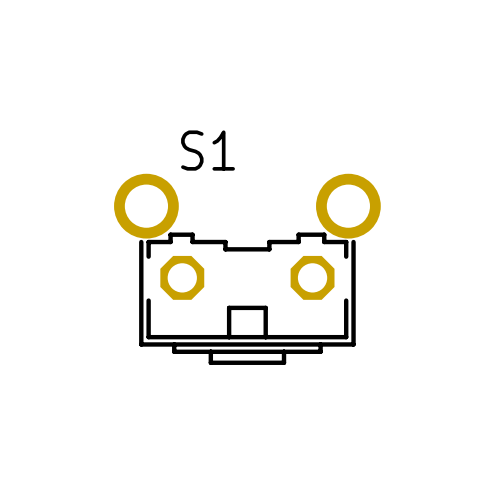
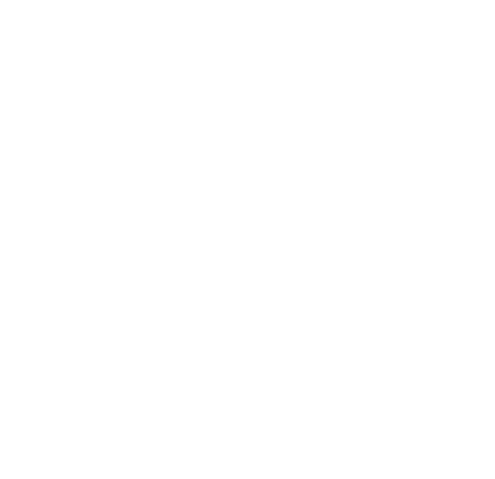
S1: (247, 269) -> none

